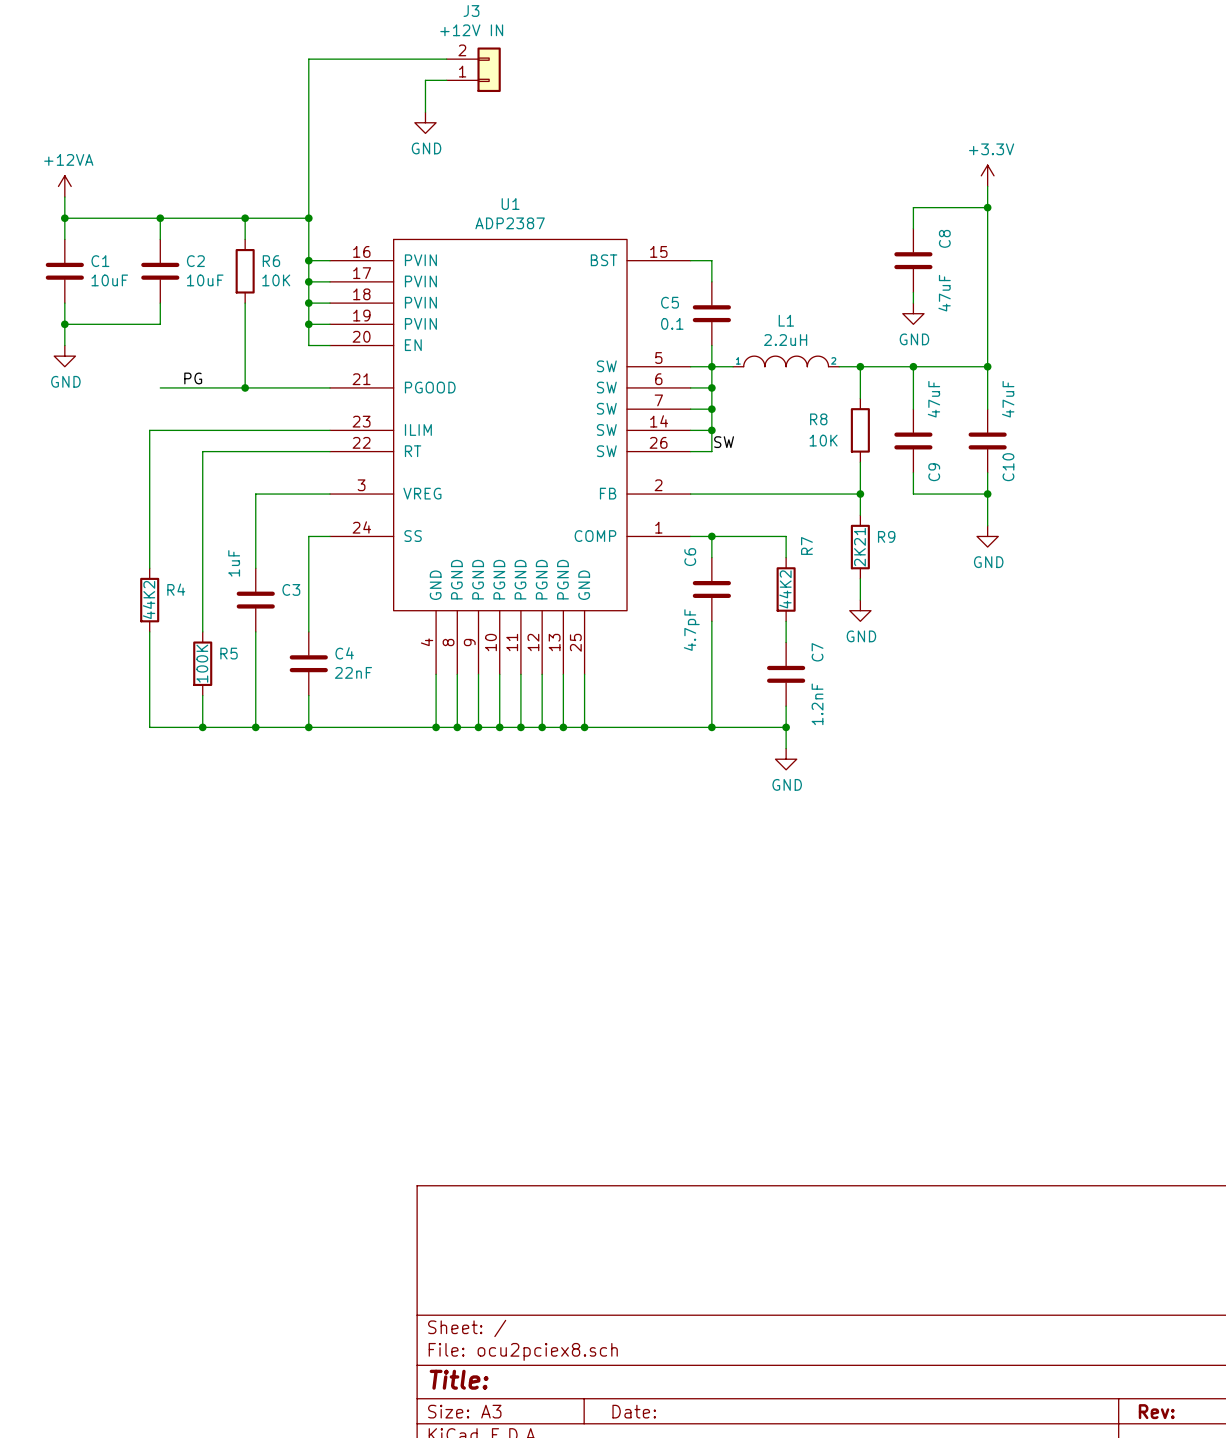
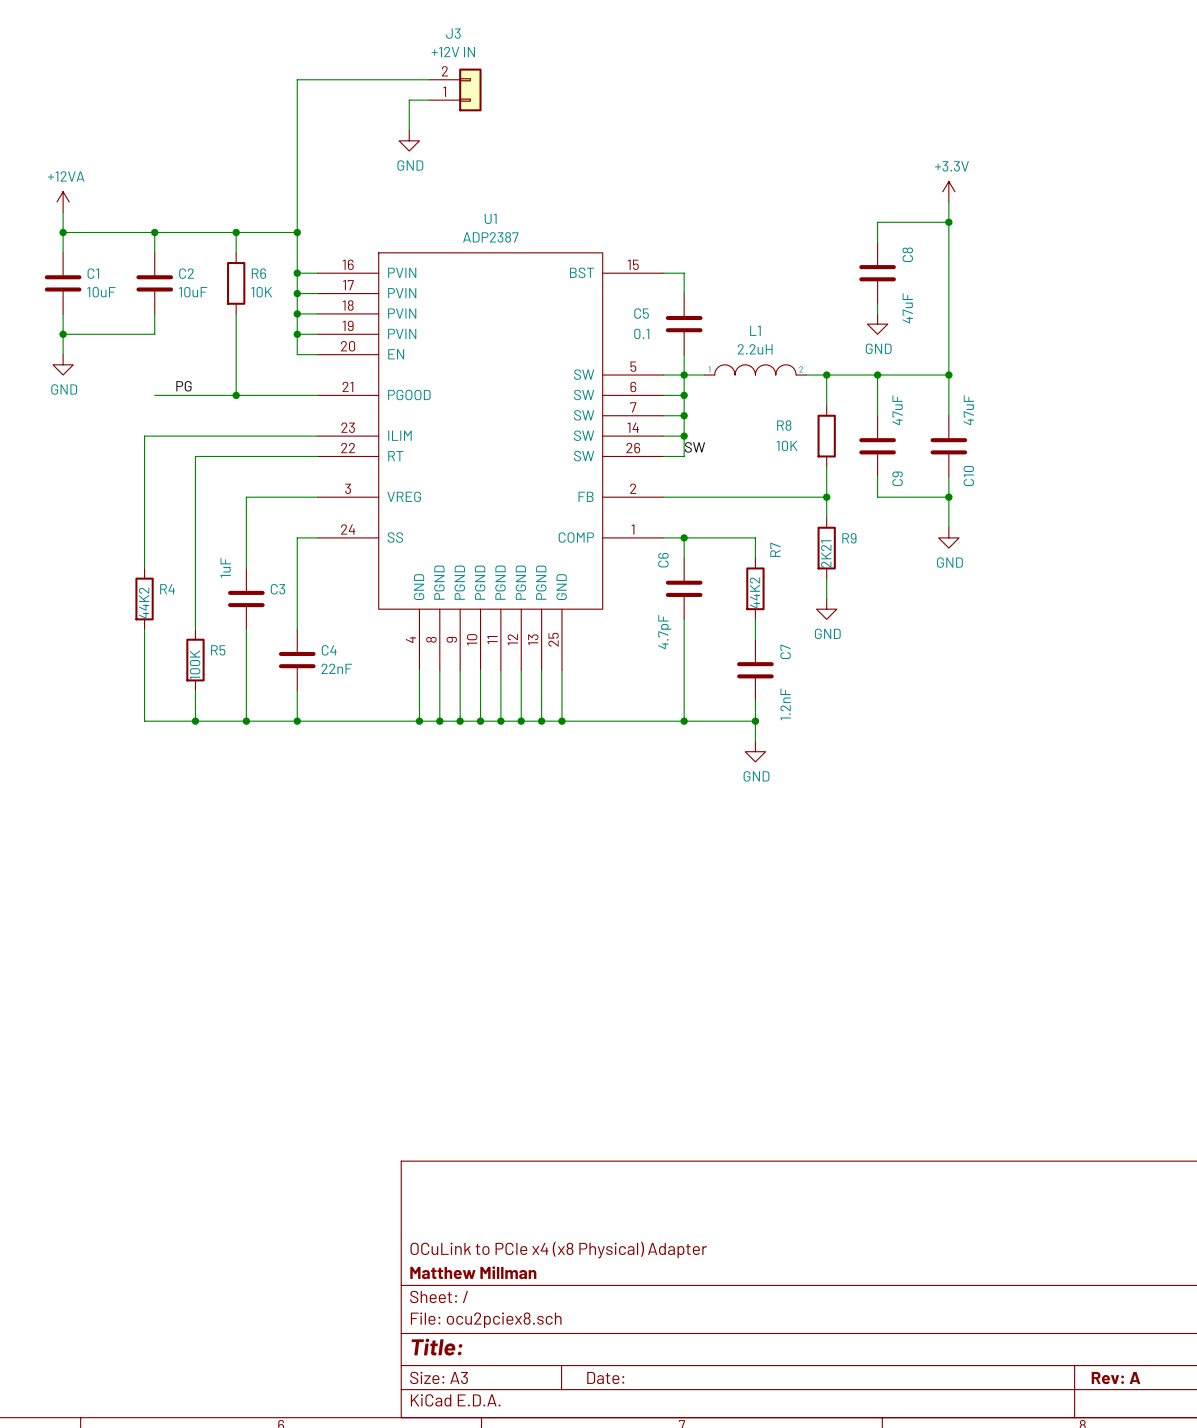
title block: none -> OCuLink to PCIe x4 (x8 Physical) Adapter (558, 1250)
title block: none -> Matthew Millman (473, 1272)
title block: Rev: (1156, 1411) -> Rev: A (1115, 1378)

